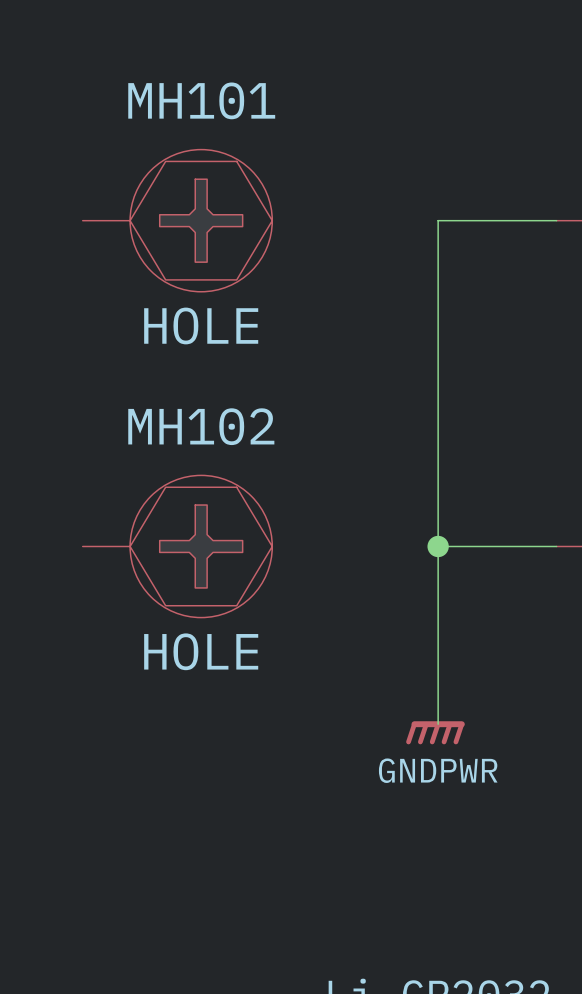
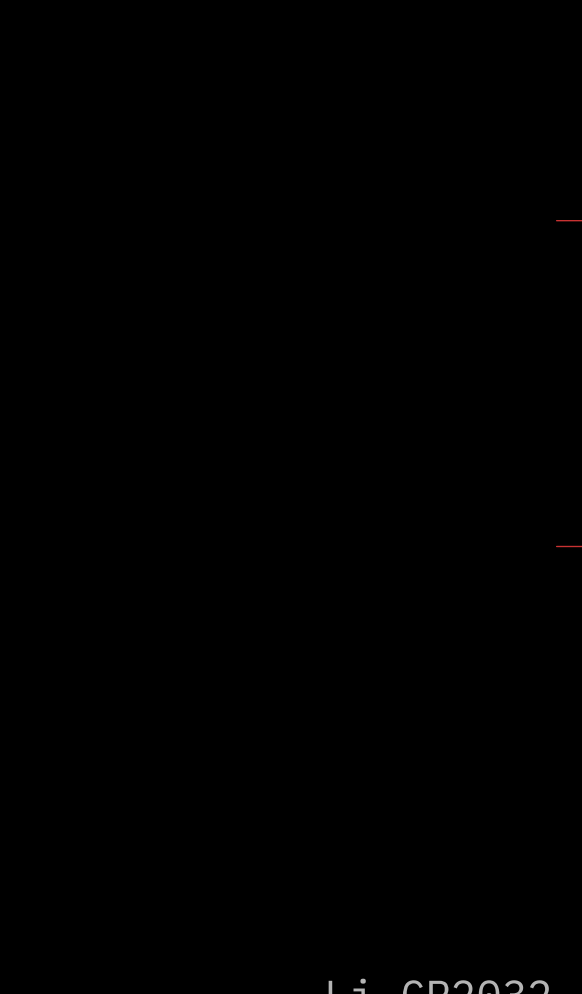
MH101: HOLE (177, 220) -> none
wire: (556, 220) (438, 220) (438, 724) -> none
MH102: HOLE (177, 546) -> none
wire: (438, 546) (556, 546) -> none
junction: (438, 546) -> none
power symbol: GNDPWR (435, 732) -> none

